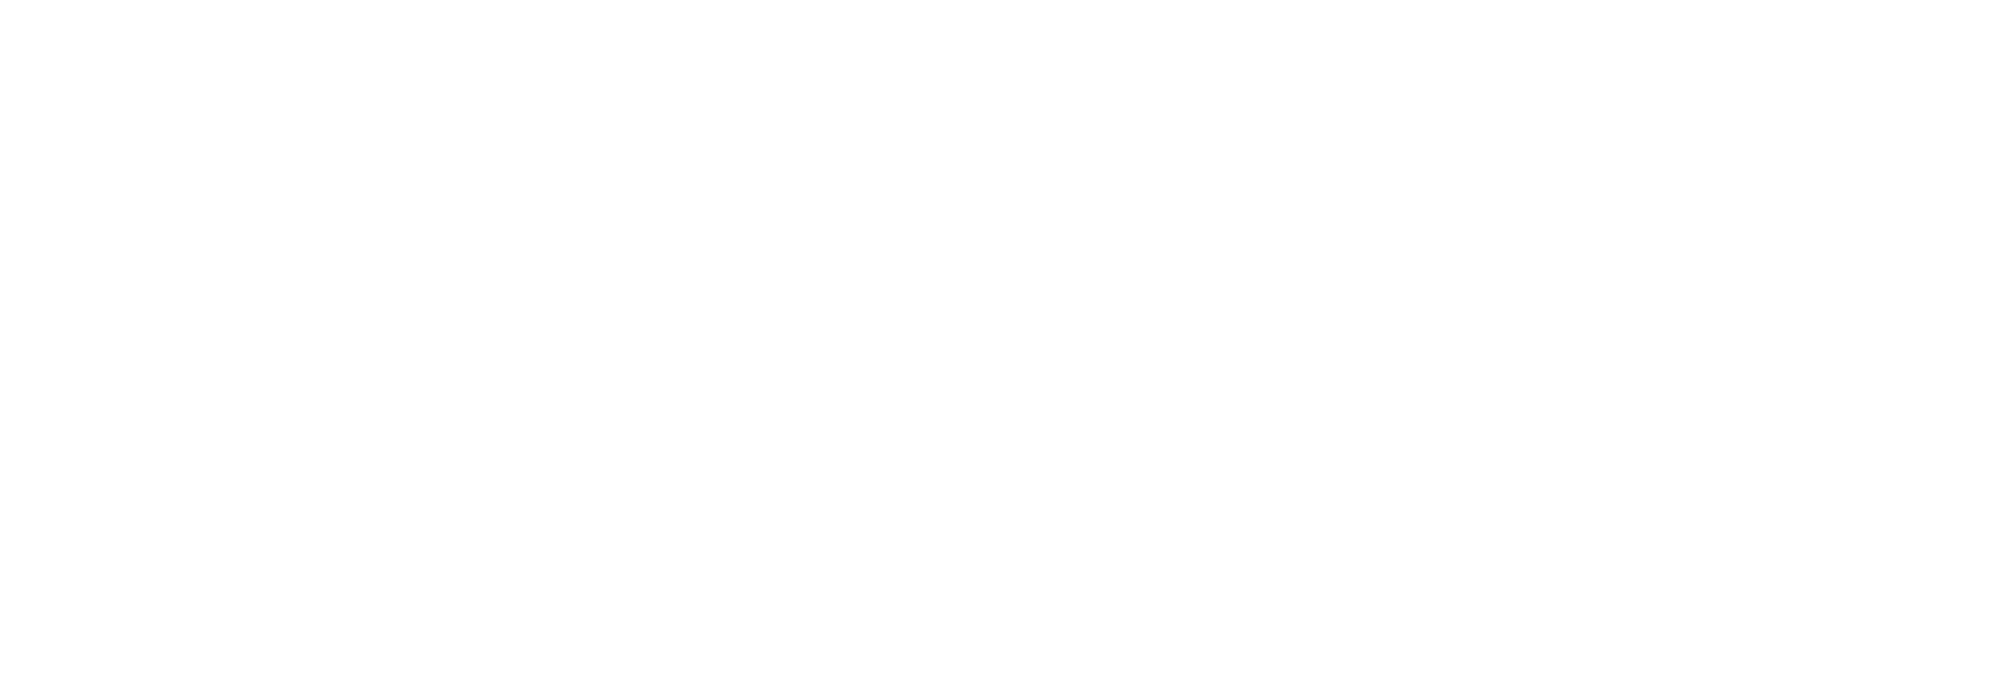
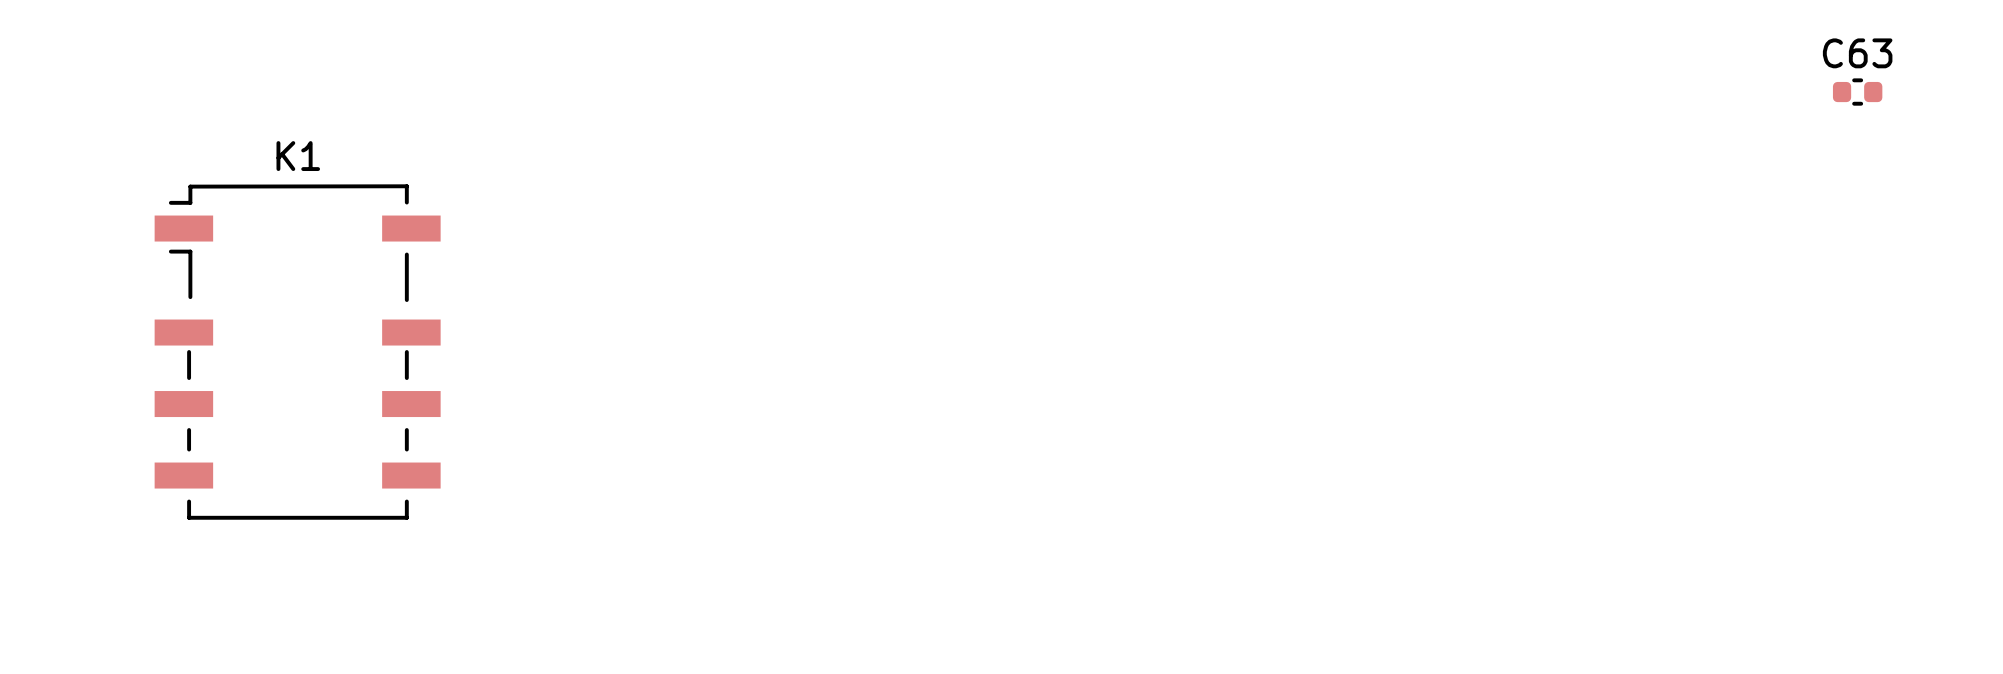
C63: none -> (1857, 92)
K1: none -> (297, 352)

